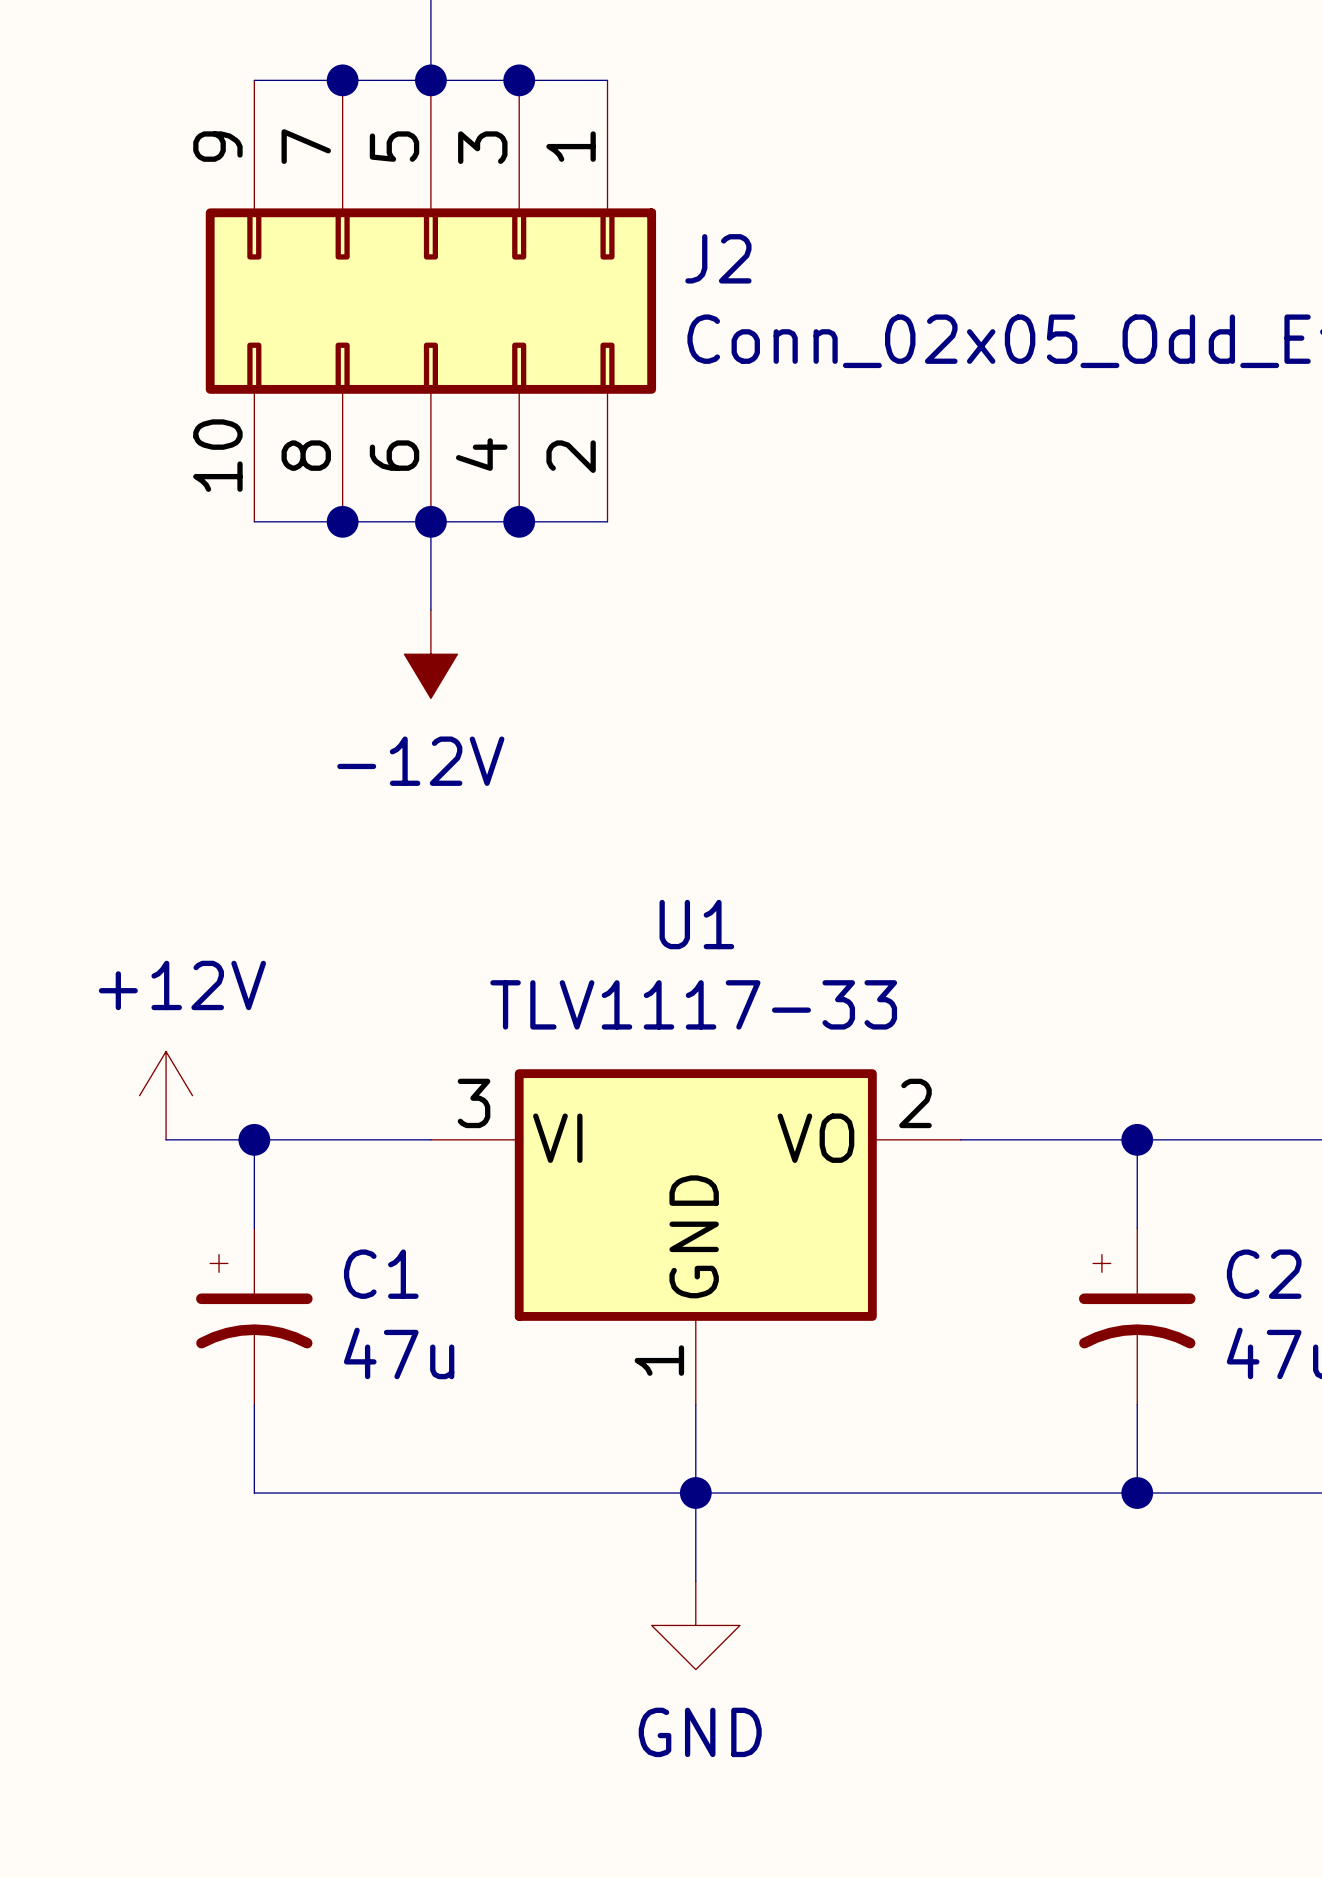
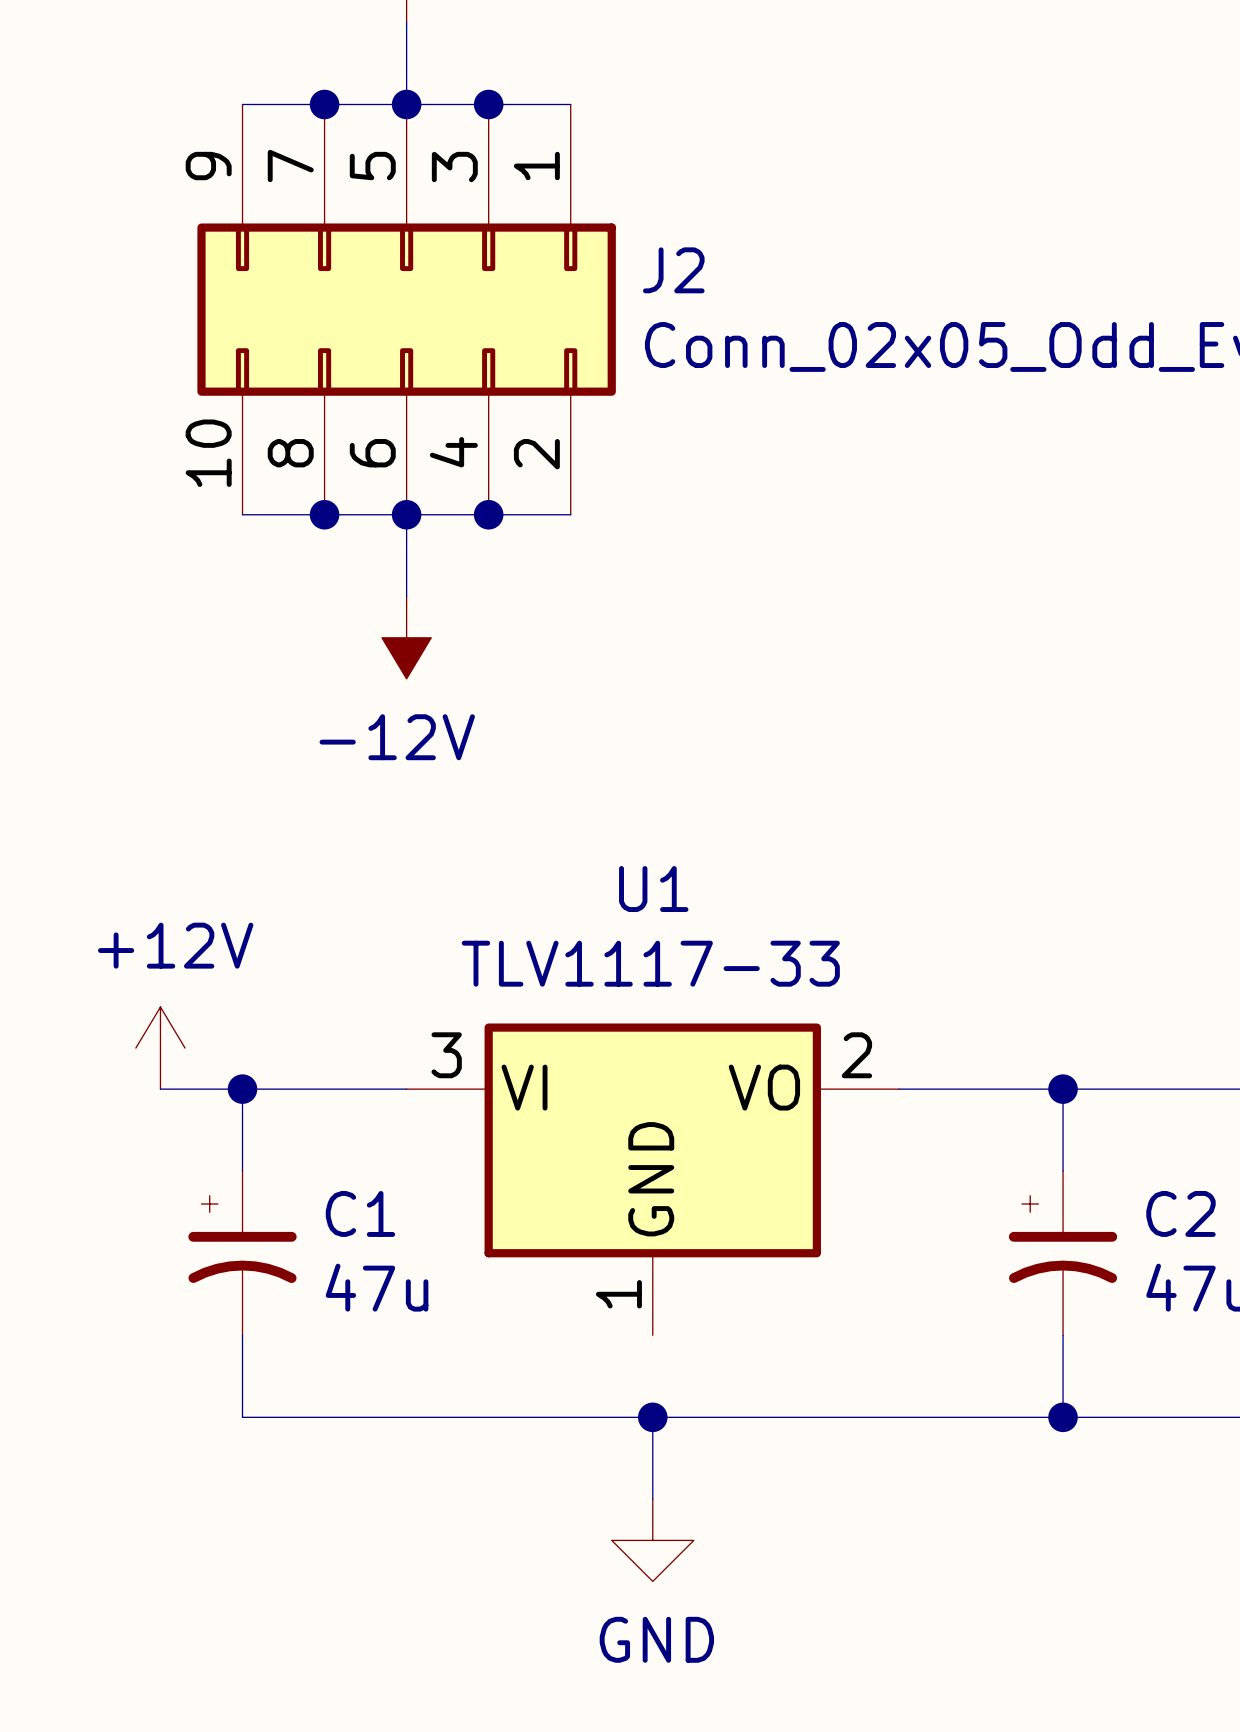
wire: (695, 1404) (695, 1493) -> none

